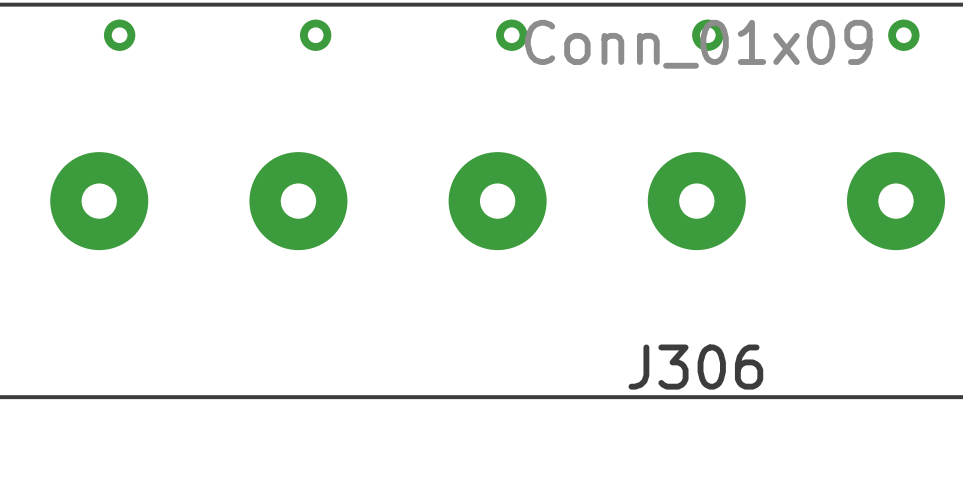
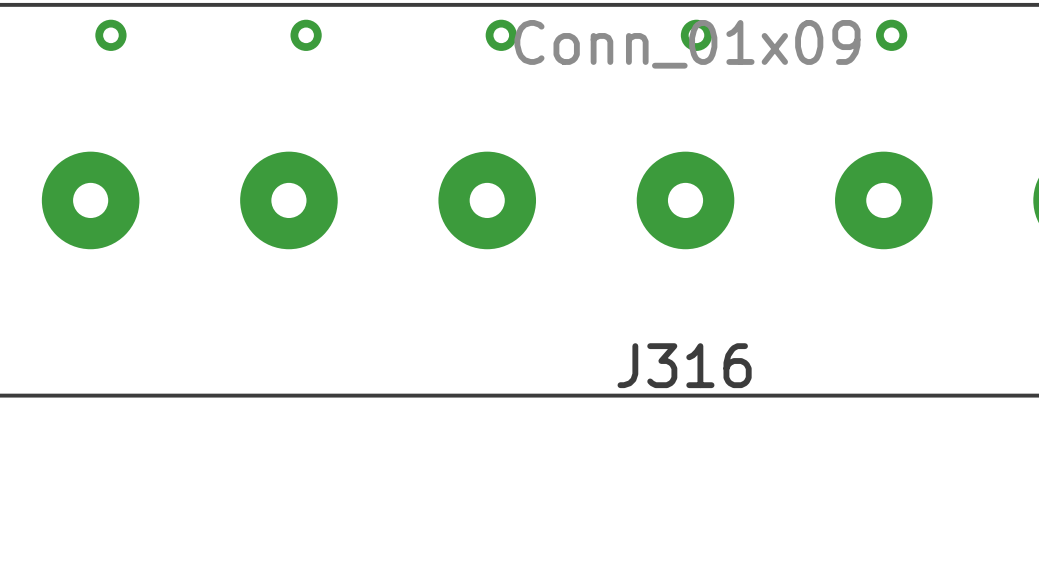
J306 name: J306 (695, 367) -> J316 (684, 365)

